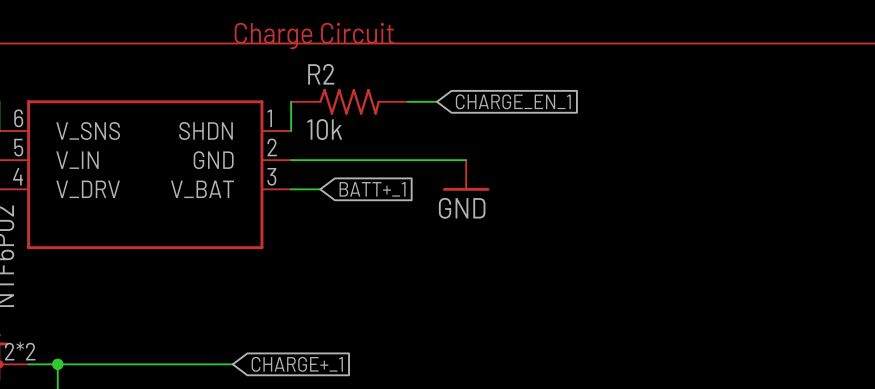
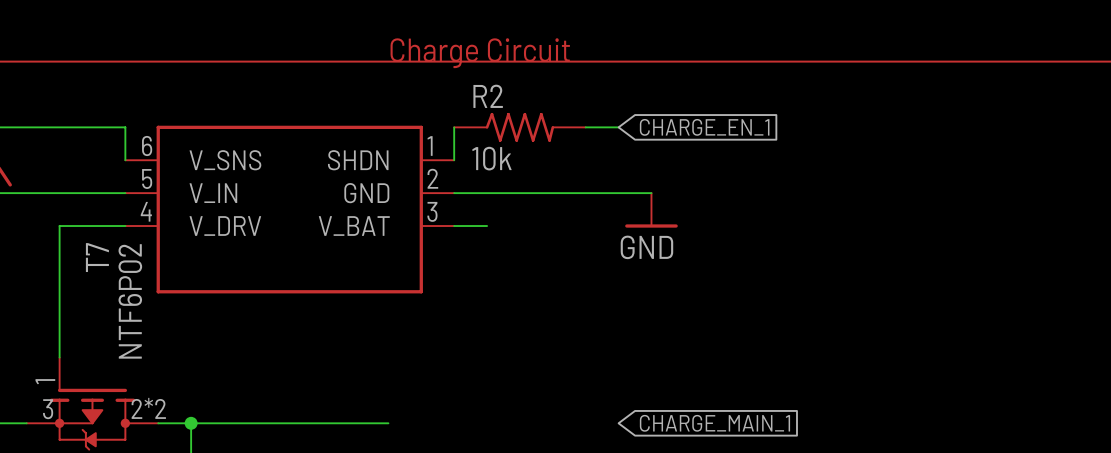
global label: BATT+_1 (372, 189) -> none
global label: CHARGE+_1 (297, 364) -> none
global label: none -> CHARGE_MAIN_1 (714, 423)

